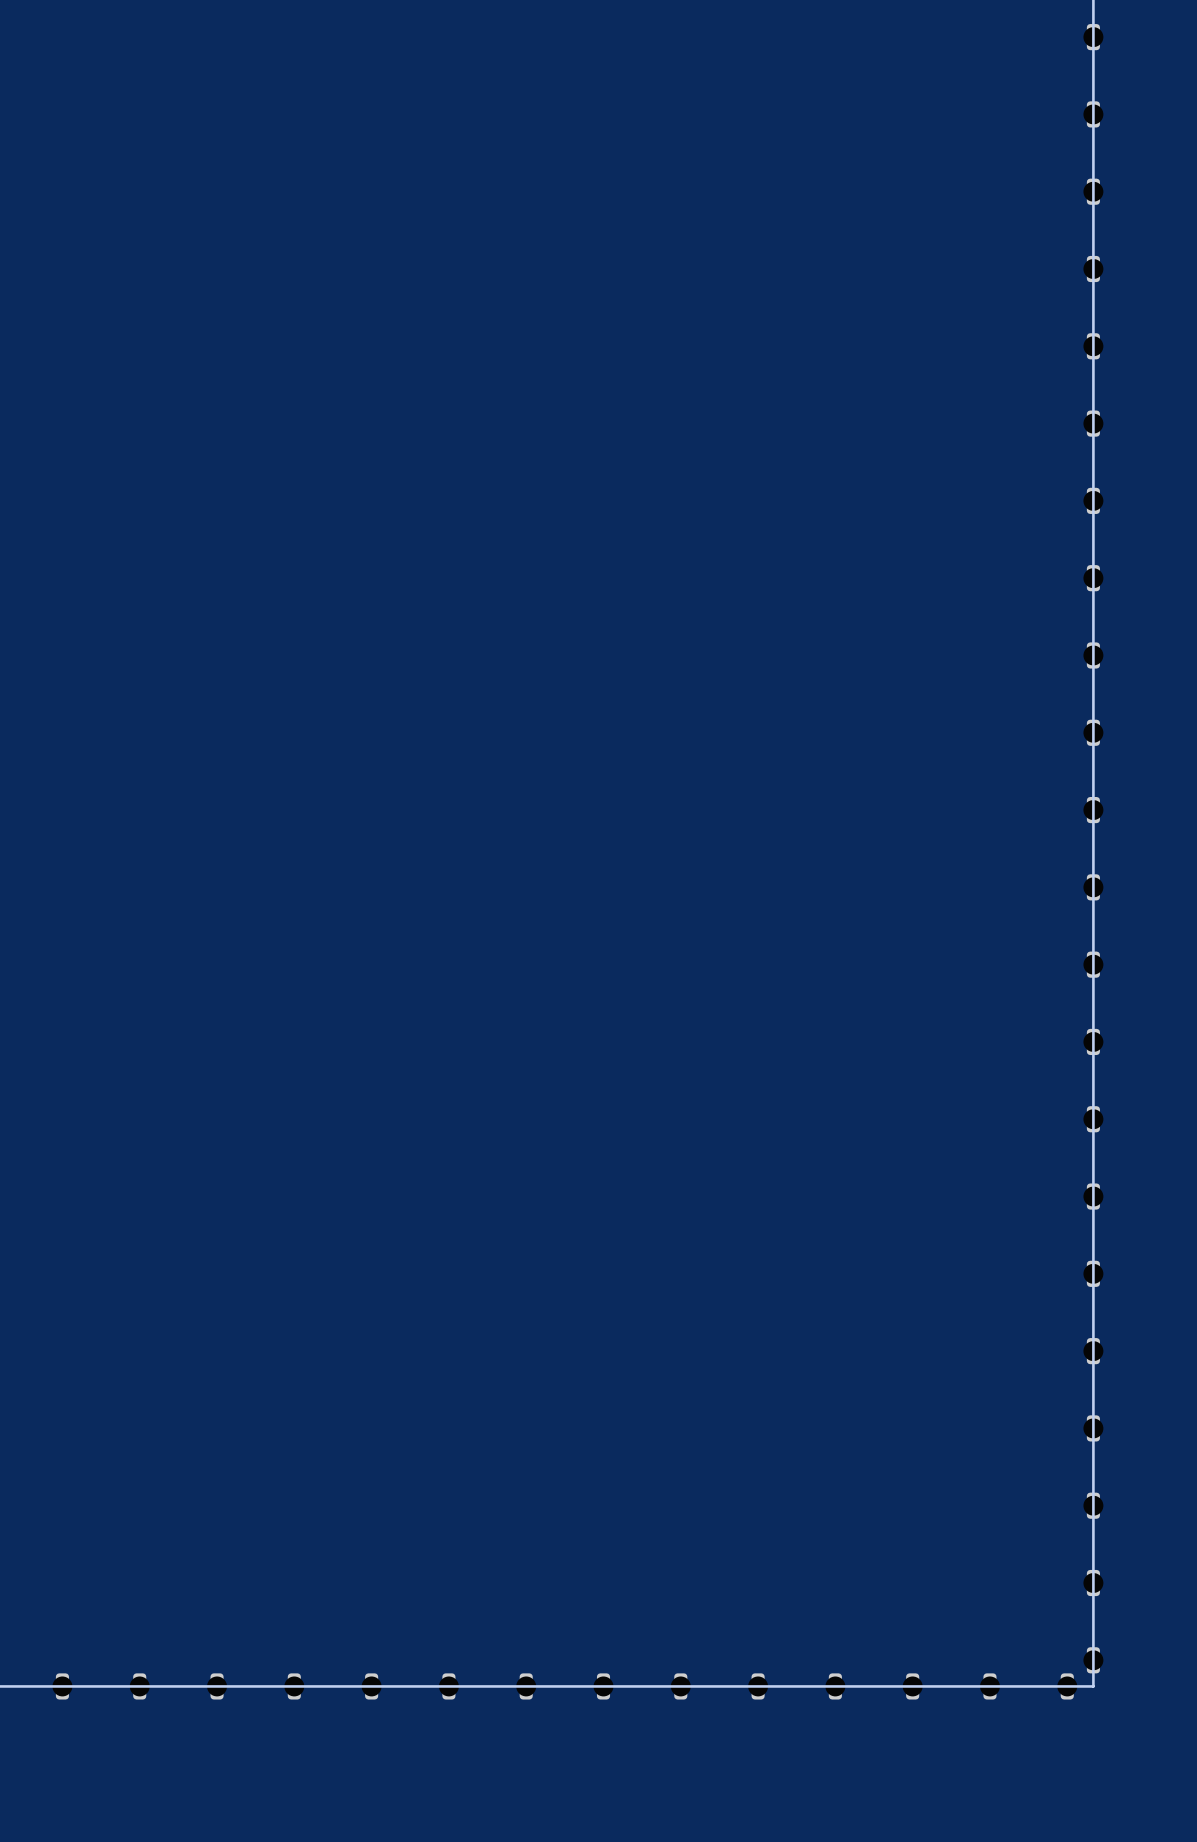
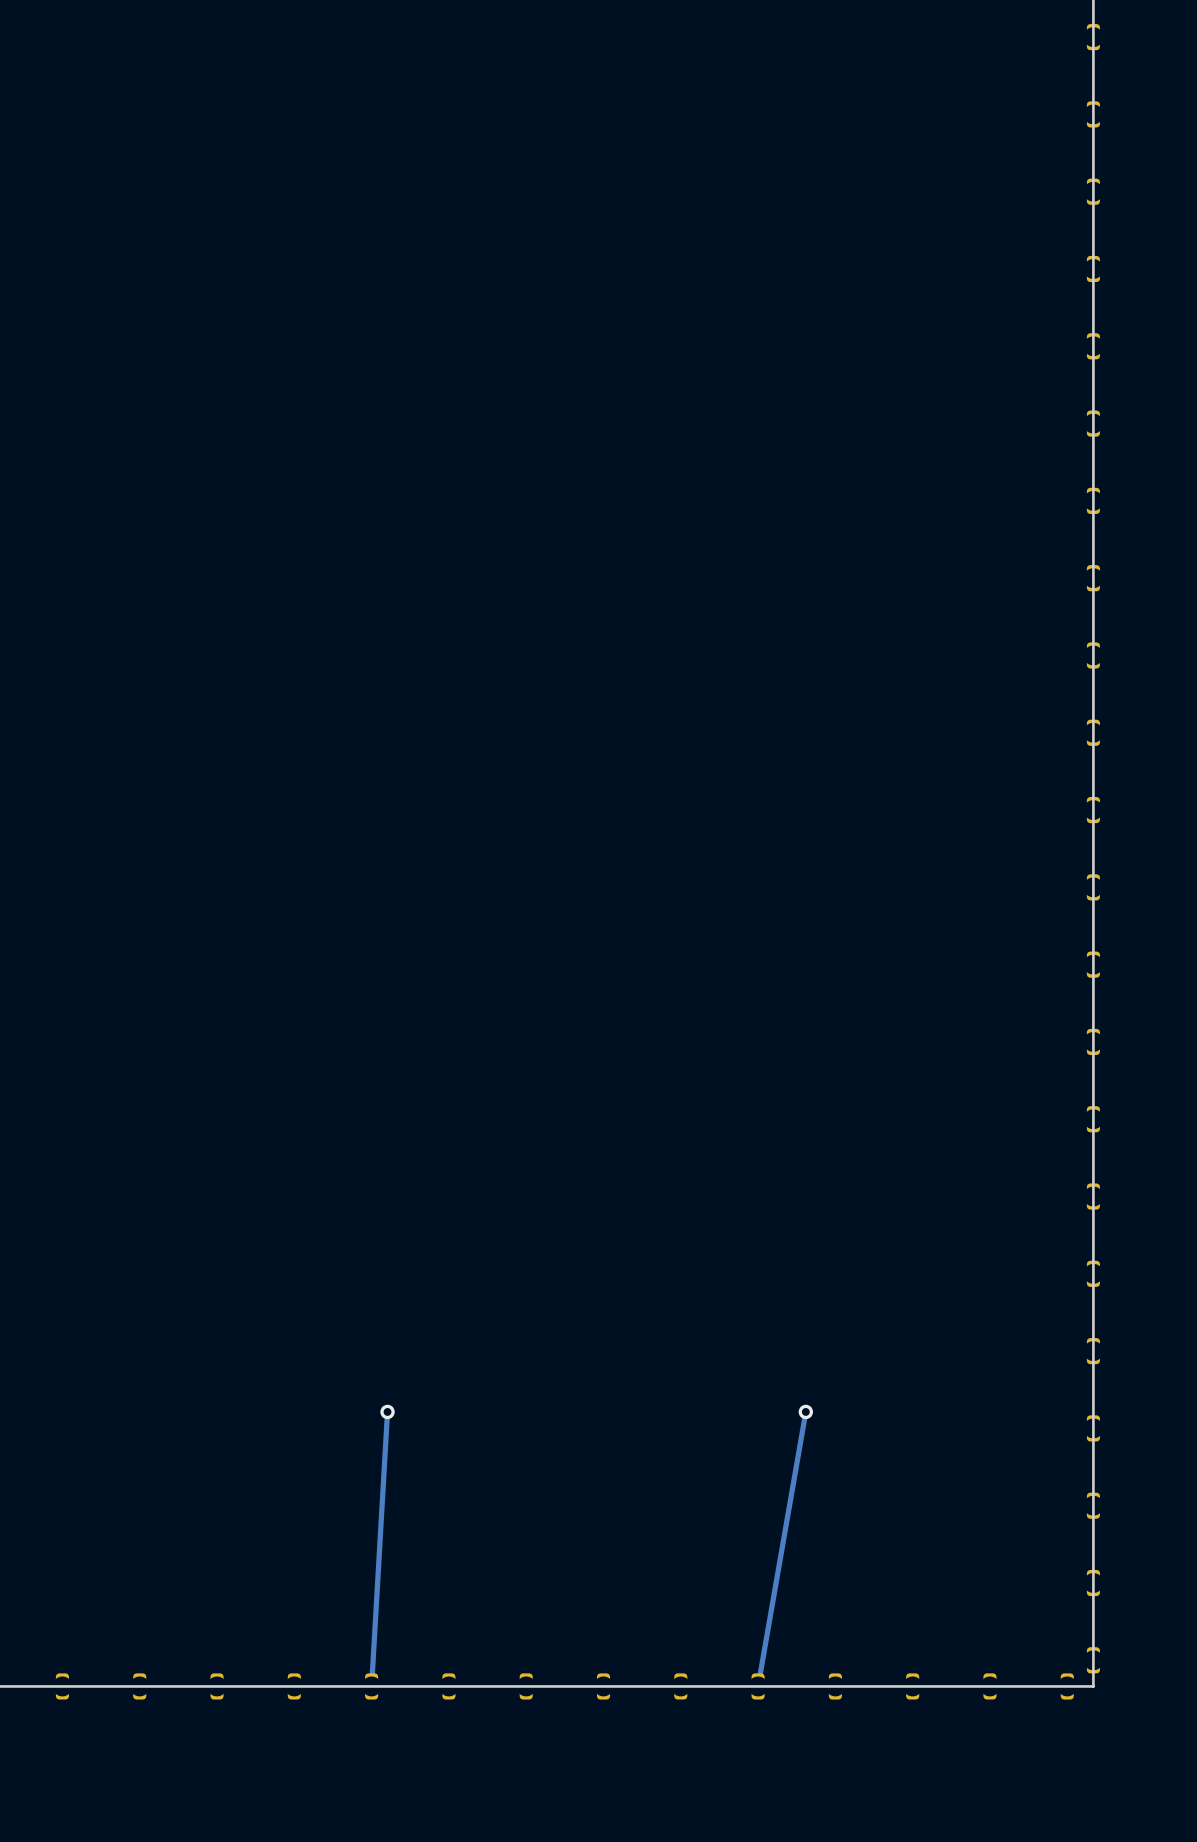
track: none -> (387, 1411) (371, 1686)
via: none -> (387, 1411)
track: none -> (805, 1411) (758, 1686)
via: none -> (805, 1411)

